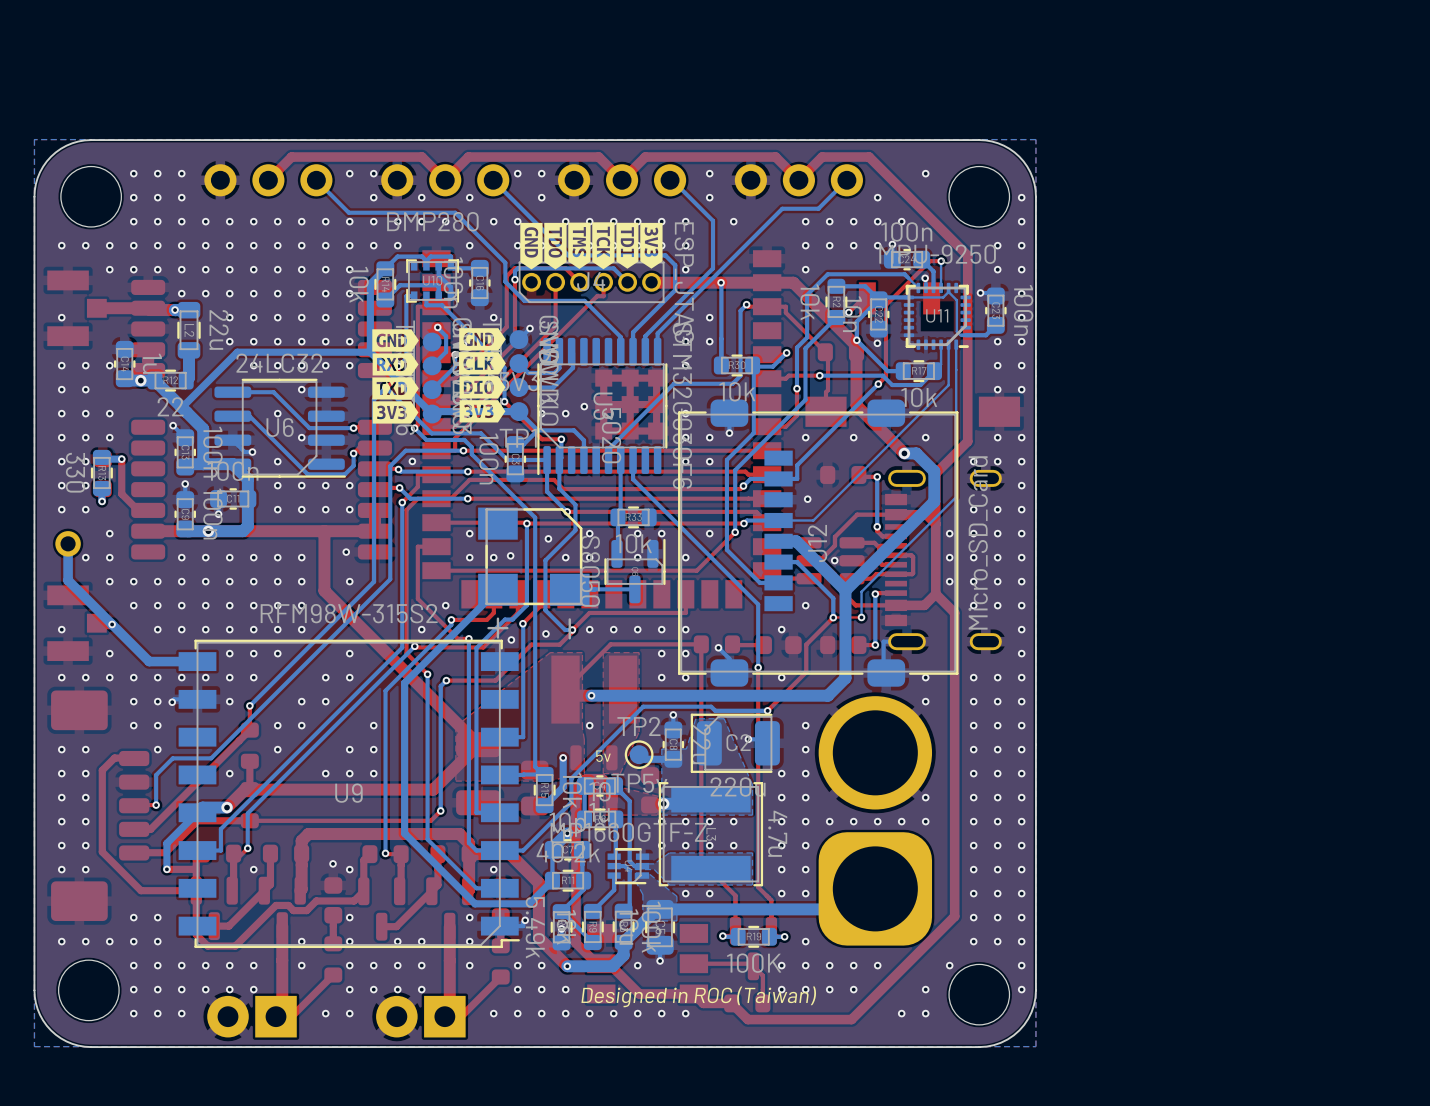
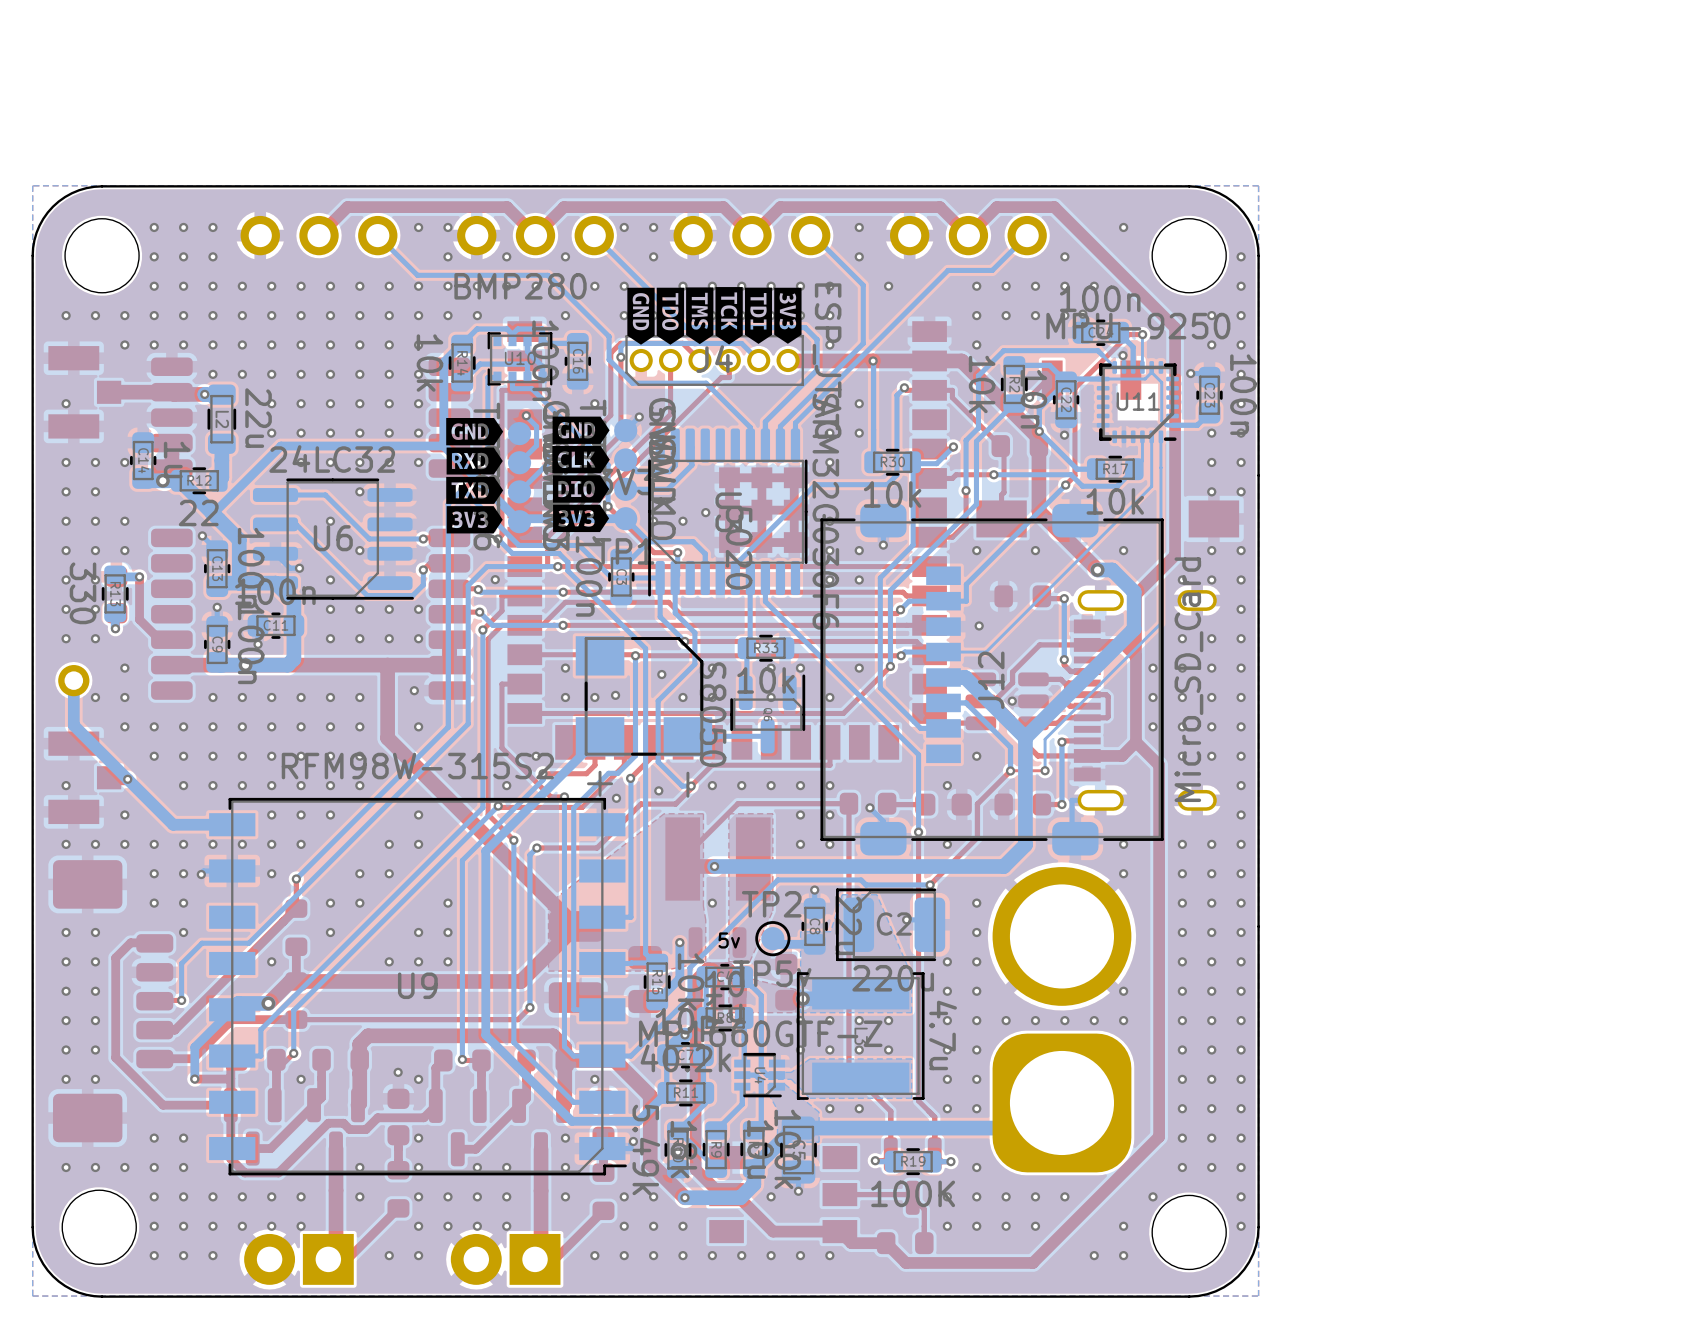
text: Designed in ROC (Taiwan) (698, 996) -> none

